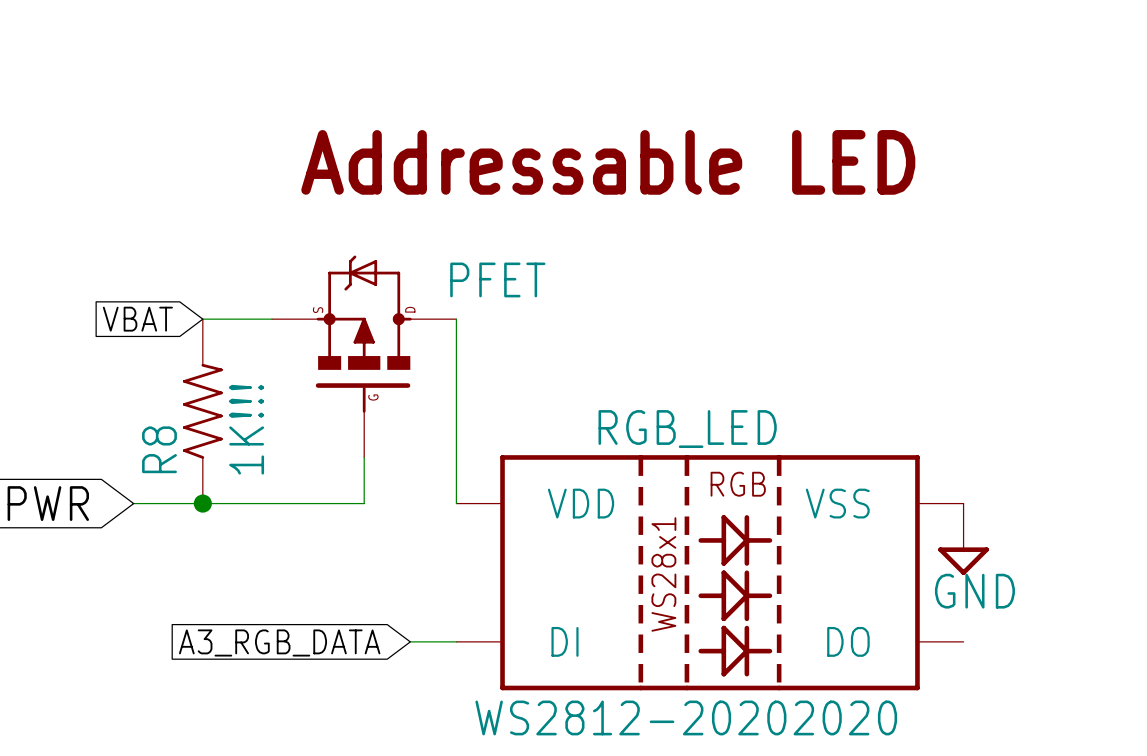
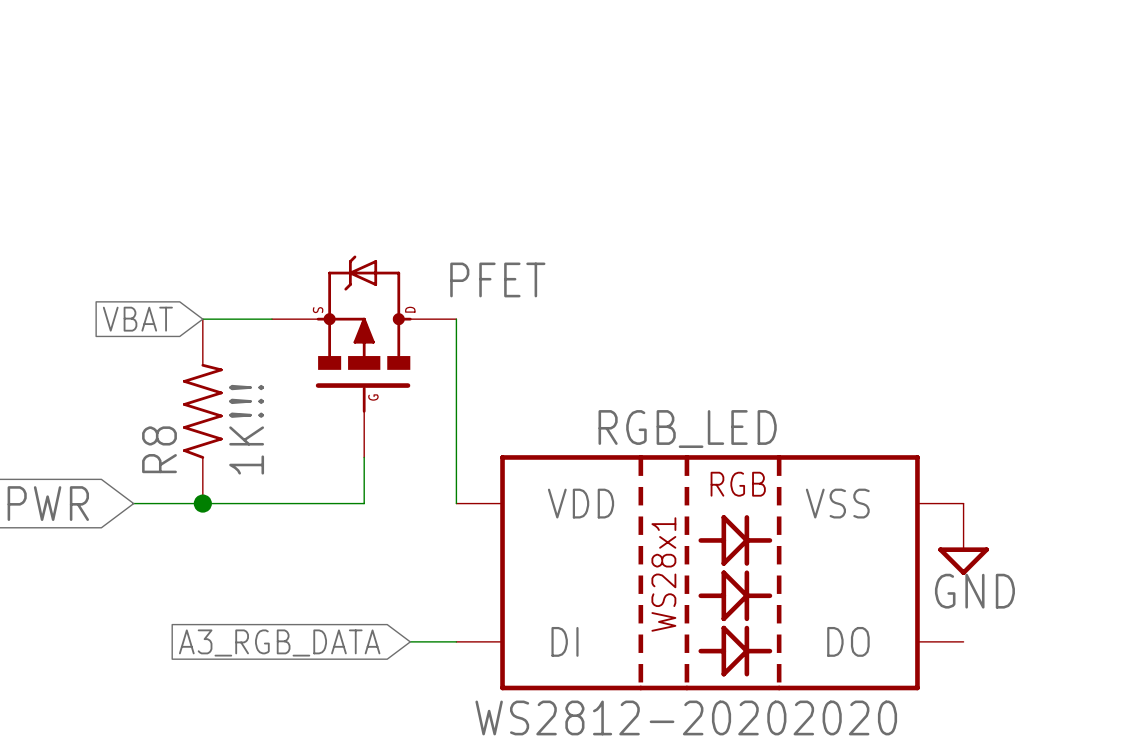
text: Addressable LED (608, 162) -> none

